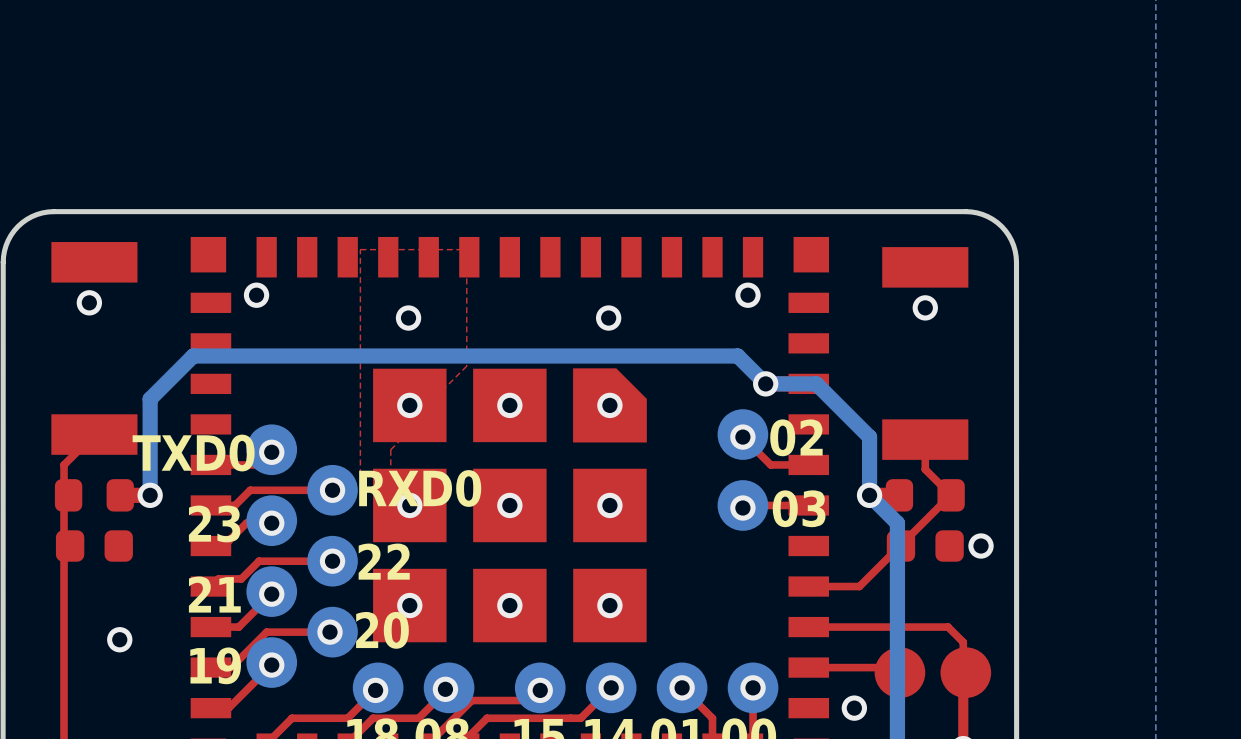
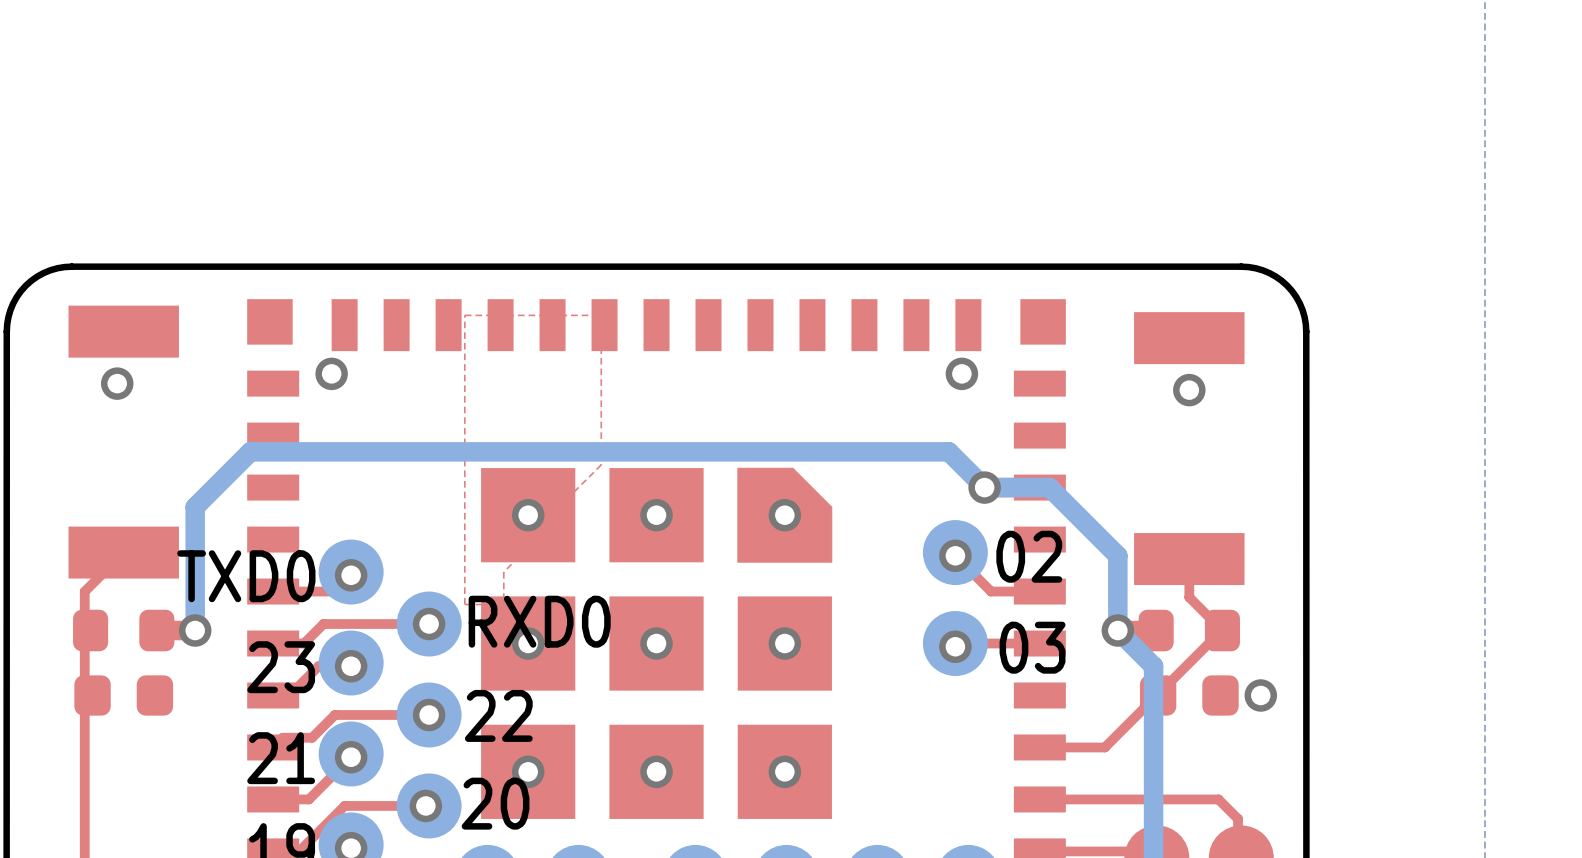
via: (408, 318) -> none
via: (608, 318) -> none
via: (119, 639) -> none

